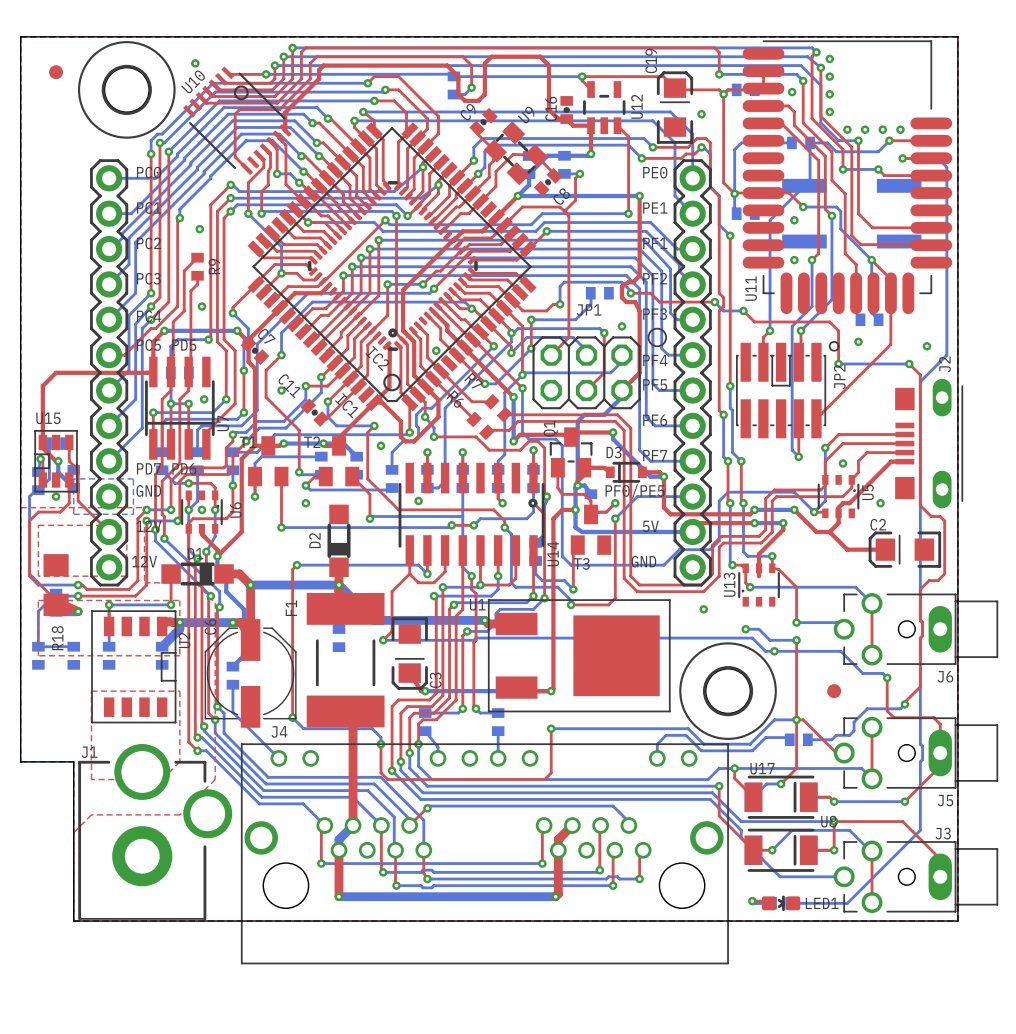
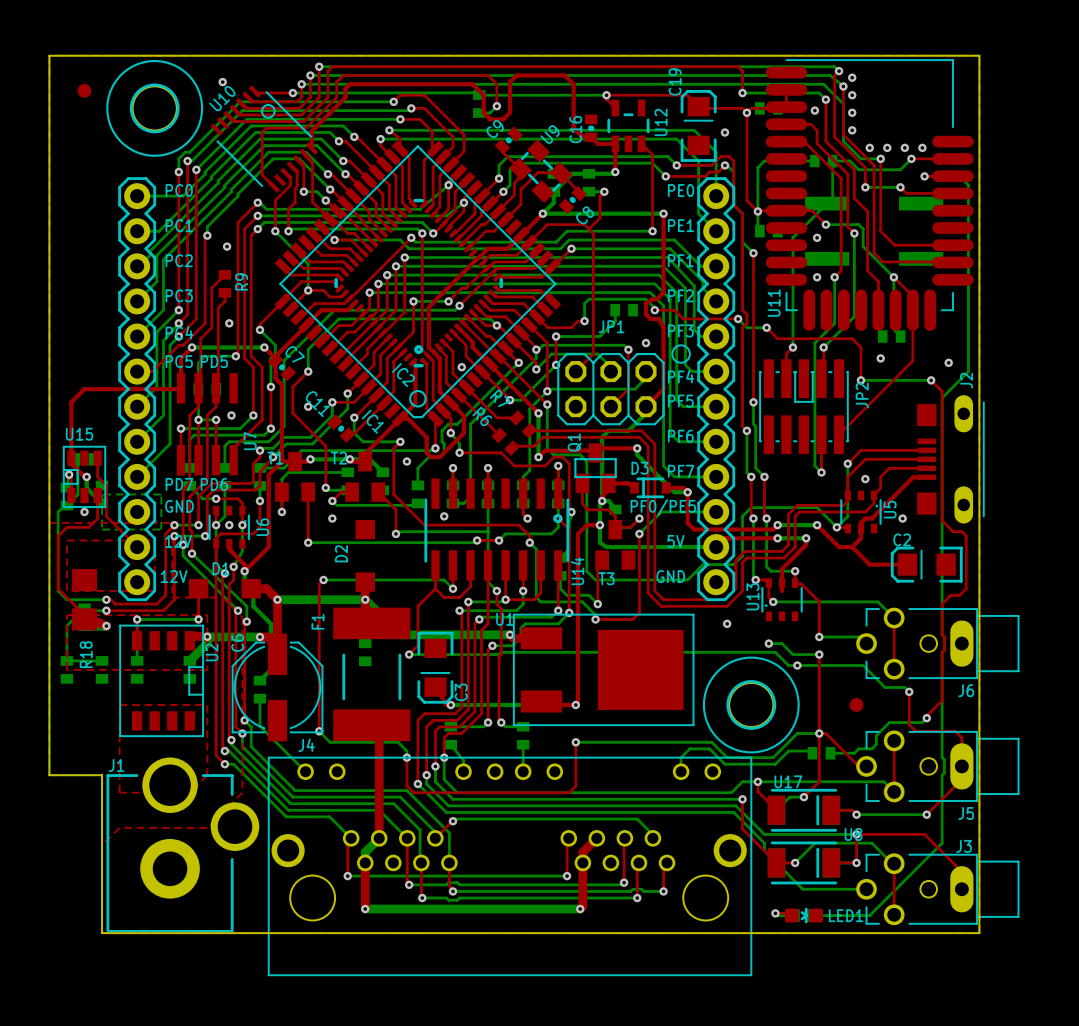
JP2 footprint: [736, 341, 840, 439] -> [759, 359, 849, 455]
U7 footprint: [145, 356, 215, 460] -> [176, 373, 238, 476]
Q1 footprint: [549, 427, 593, 478] -> [574, 443, 617, 493]
D2 footprint: [327, 504, 351, 578] -> [355, 519, 375, 592]
D1 footprint: [161, 562, 234, 586] -> [188, 579, 261, 599]

